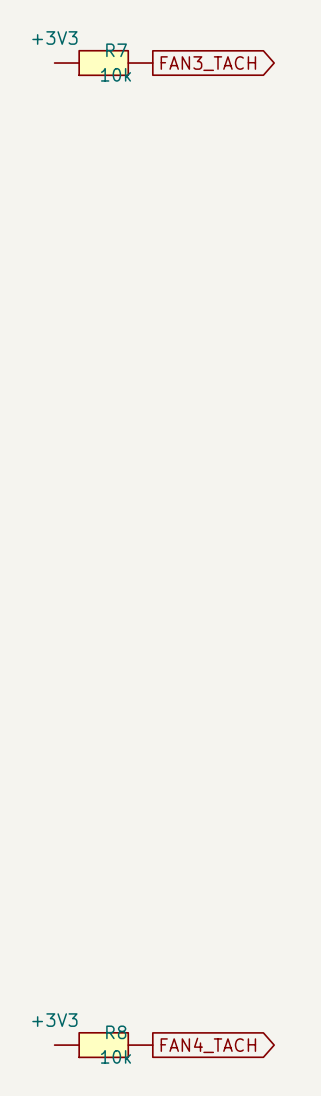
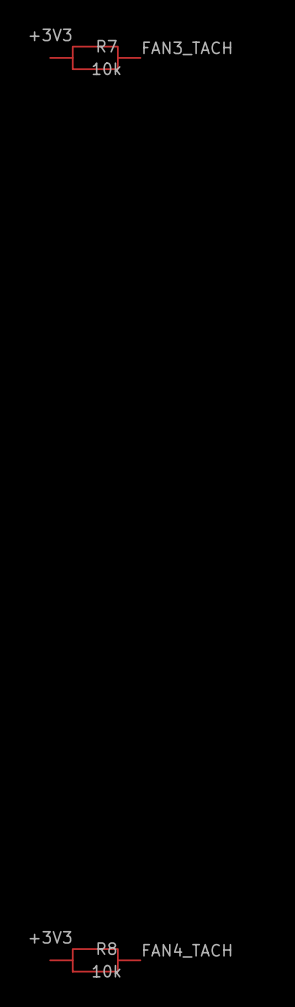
label: none -> FAN3_TACH (187, 48)
global label: FAN3_TACH (208, 63) -> none
label: none -> FAN4_TACH (187, 950)
global label: FAN4_TACH (208, 1045) -> none

